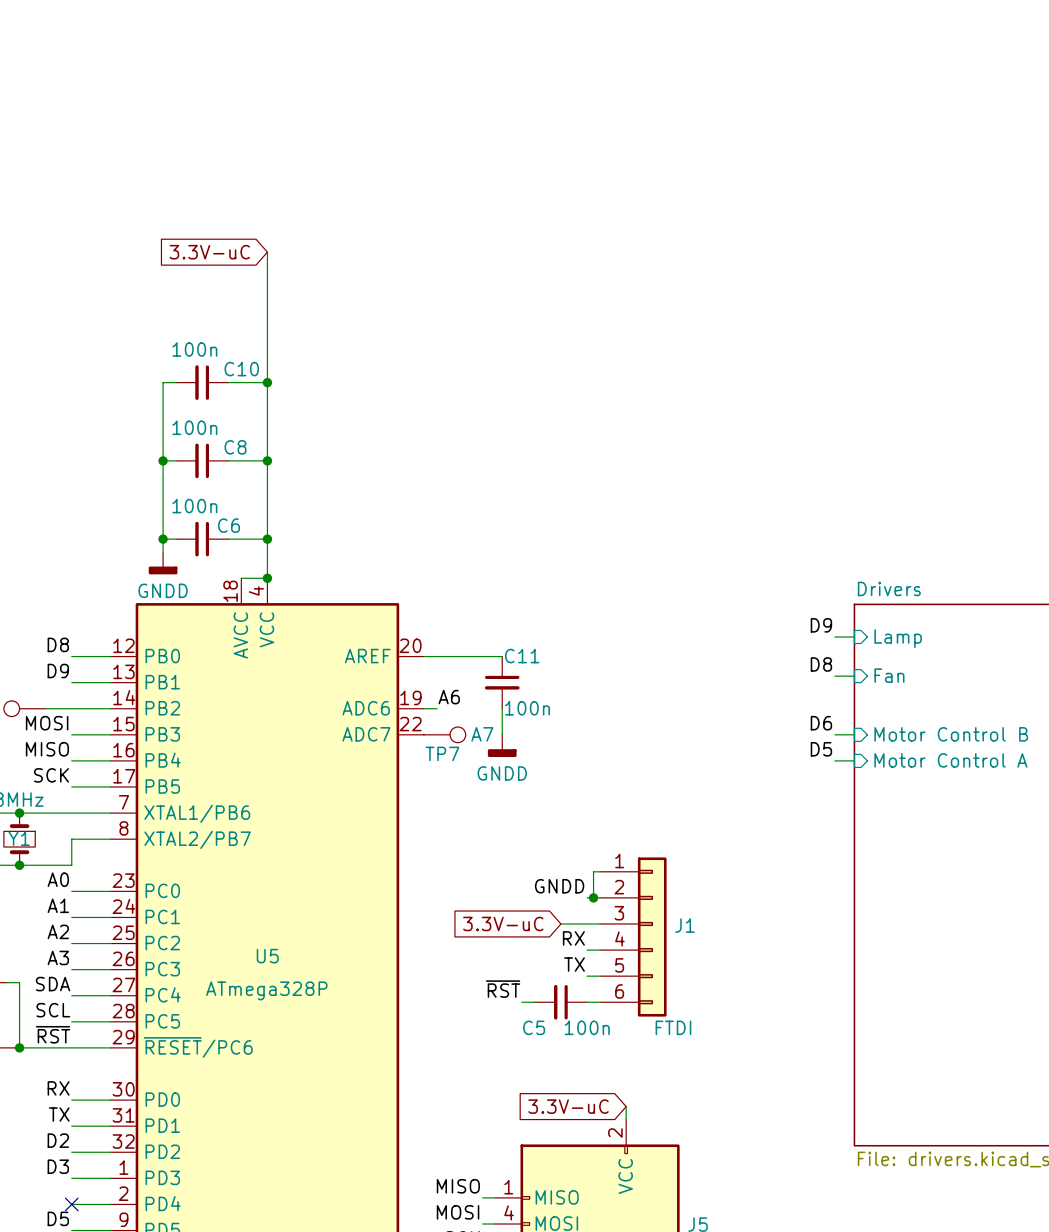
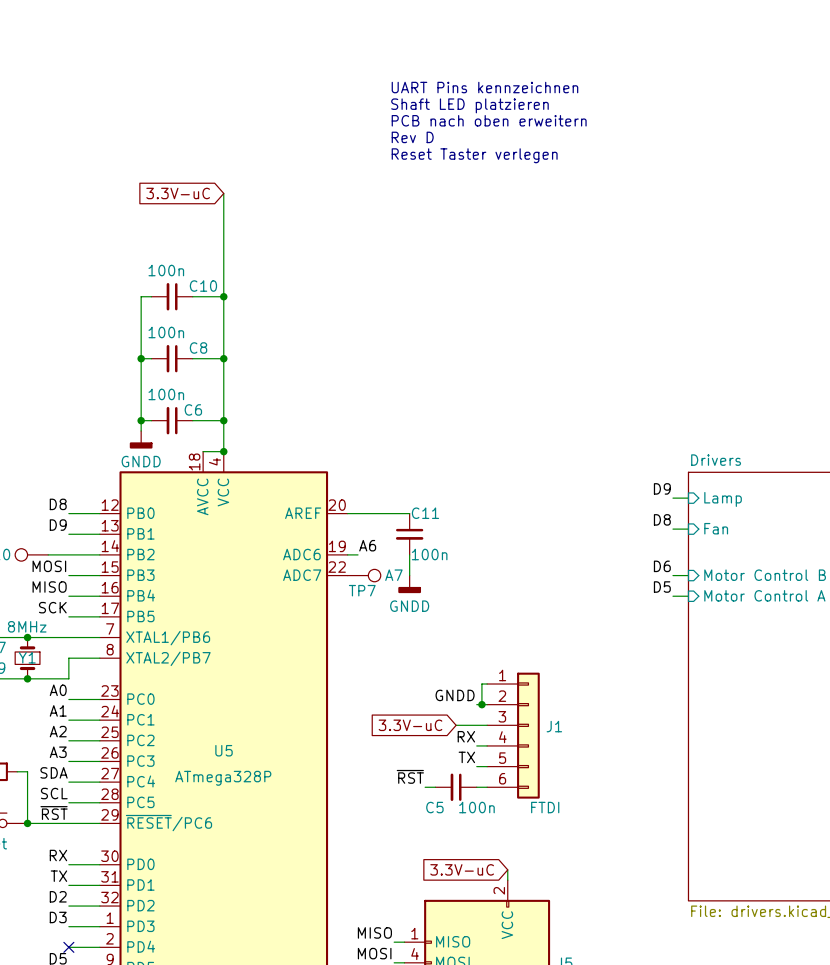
text: none -> UART Pins kennzeichnen (484, 87)
text: none -> Shaft LED platzieren (469, 105)
text: none -> PCB nach oben erweitern (489, 120)
text: none -> Rev D (412, 137)
text: none -> Reset Taster verlegen (474, 155)

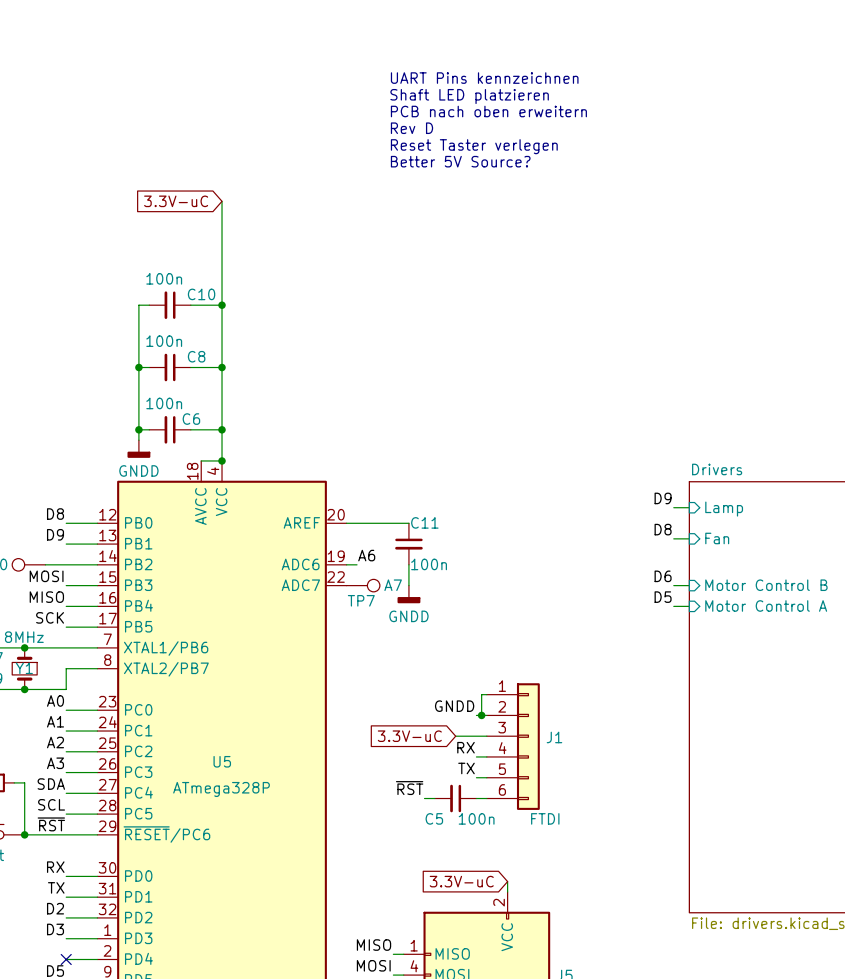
text: none -> UART Pins kennzeichnen (484, 78)
text: UART Pins kennzeichnen (484, 87) -> Shaft LED platzieren (469, 96)
text: Shaft LED platzieren (469, 105) -> PCB nach oben erweitern (488, 111)
text: PCB nach oben erweitern (489, 120) -> Rev D (411, 128)
text: Rev D (412, 137) -> Reset Taster verlegen (474, 146)
text: Reset Taster verlegen (474, 155) -> Better 5V Source? (460, 161)

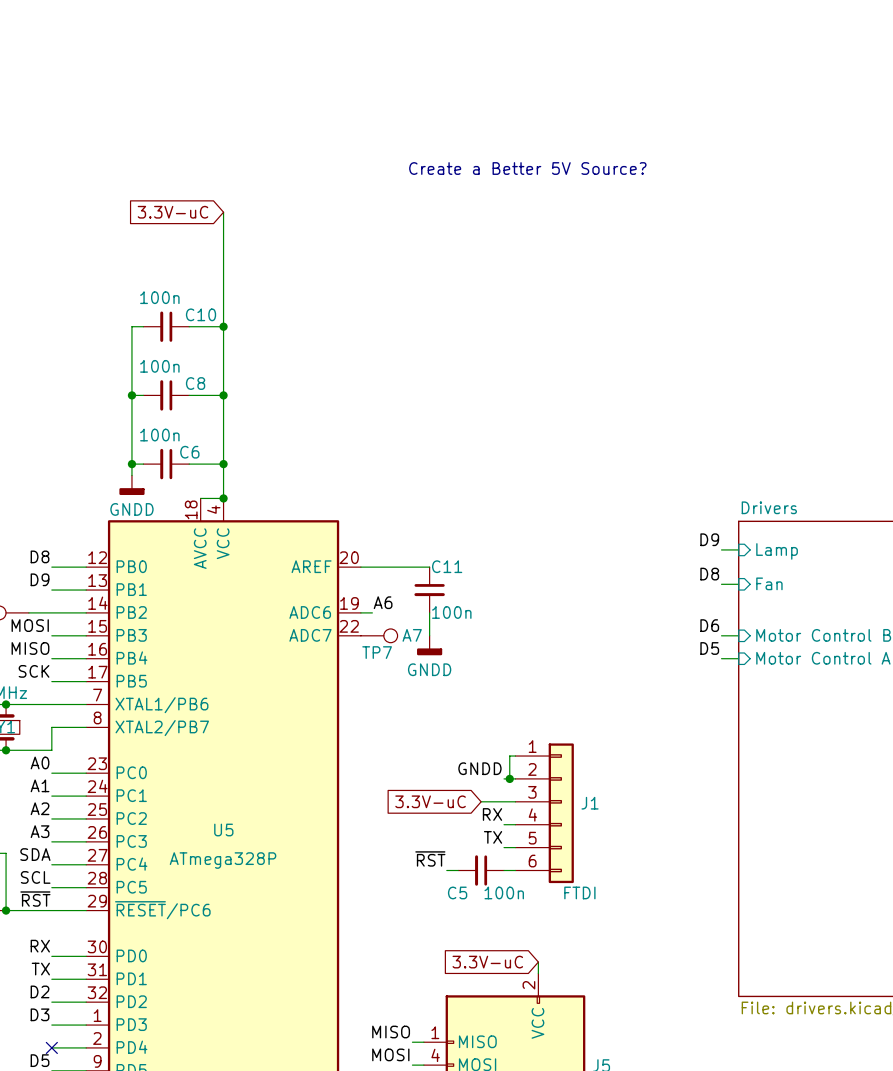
text: UART Pins kennzeichnen (484, 78) -> none
text: Shaft LED platzieren (469, 96) -> none
text: PCB nach oben erweitern (488, 111) -> none
text: Rev D (411, 128) -> none
text: Reset Taster verlegen (474, 146) -> none
text: Better 5V Source? (460, 161) -> Create a Better 5V Source? (527, 168)

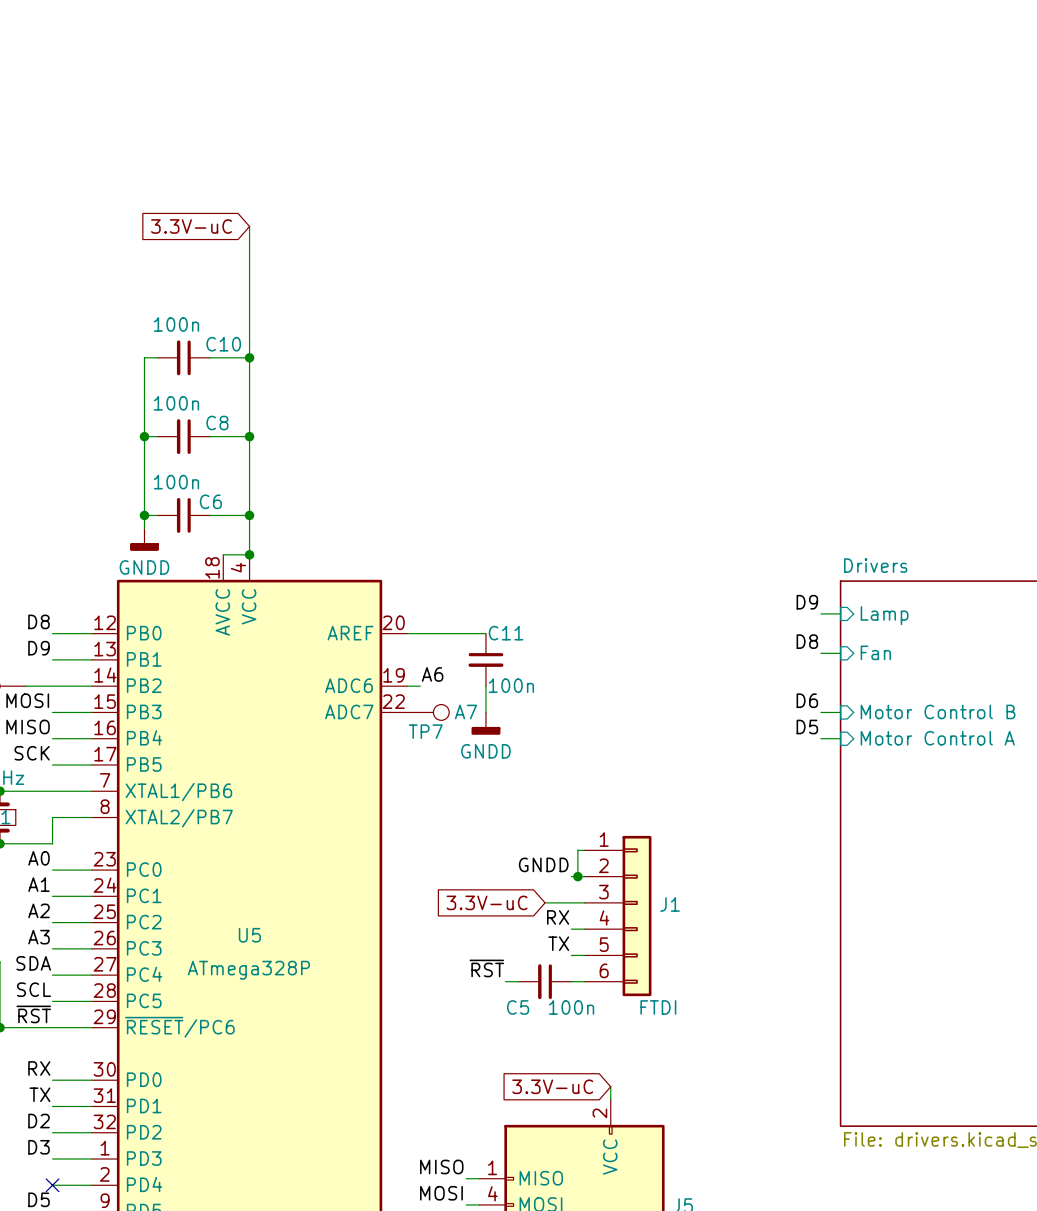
text: Create a Better 5V Source? (527, 168) -> none

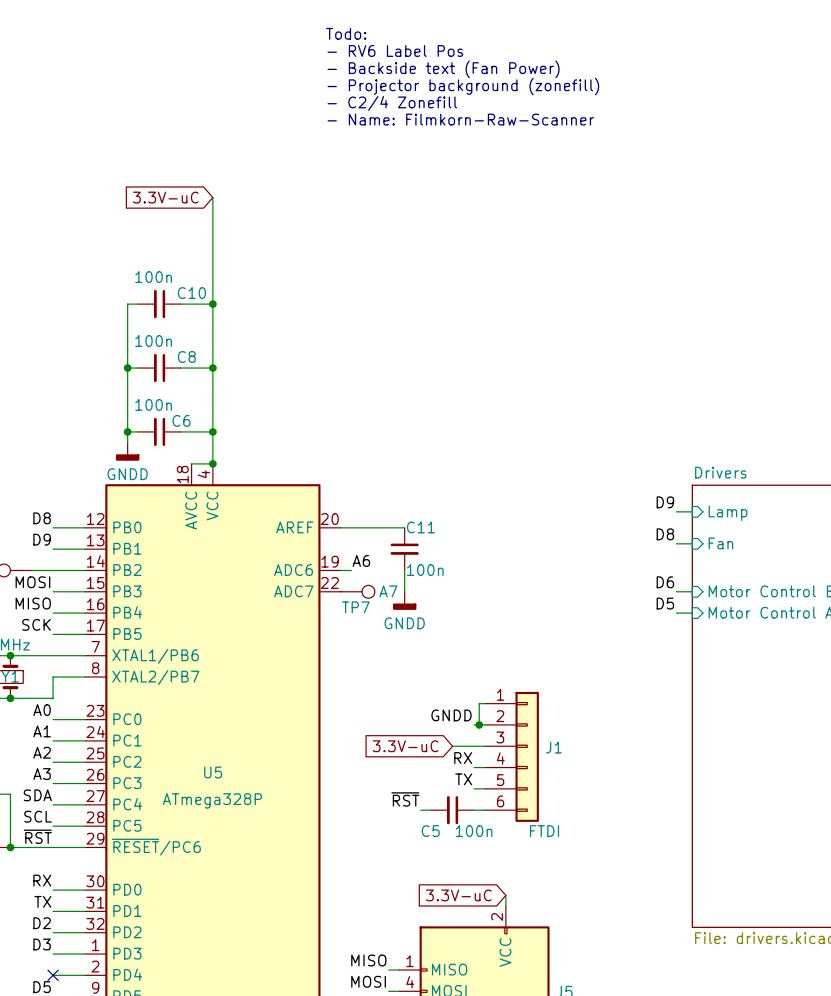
text: none -> Todo: (346, 33)
text: none -> - RV6 Label Pos (395, 50)
text: none -> - Backside text (Fan Power) (443, 69)
text: none -> - Projector background (zonefill) (463, 86)
text: none -> - C2/4 Zonefill (392, 103)
text: none -> - Name: Filmkorn-Raw-Scanner (460, 119)

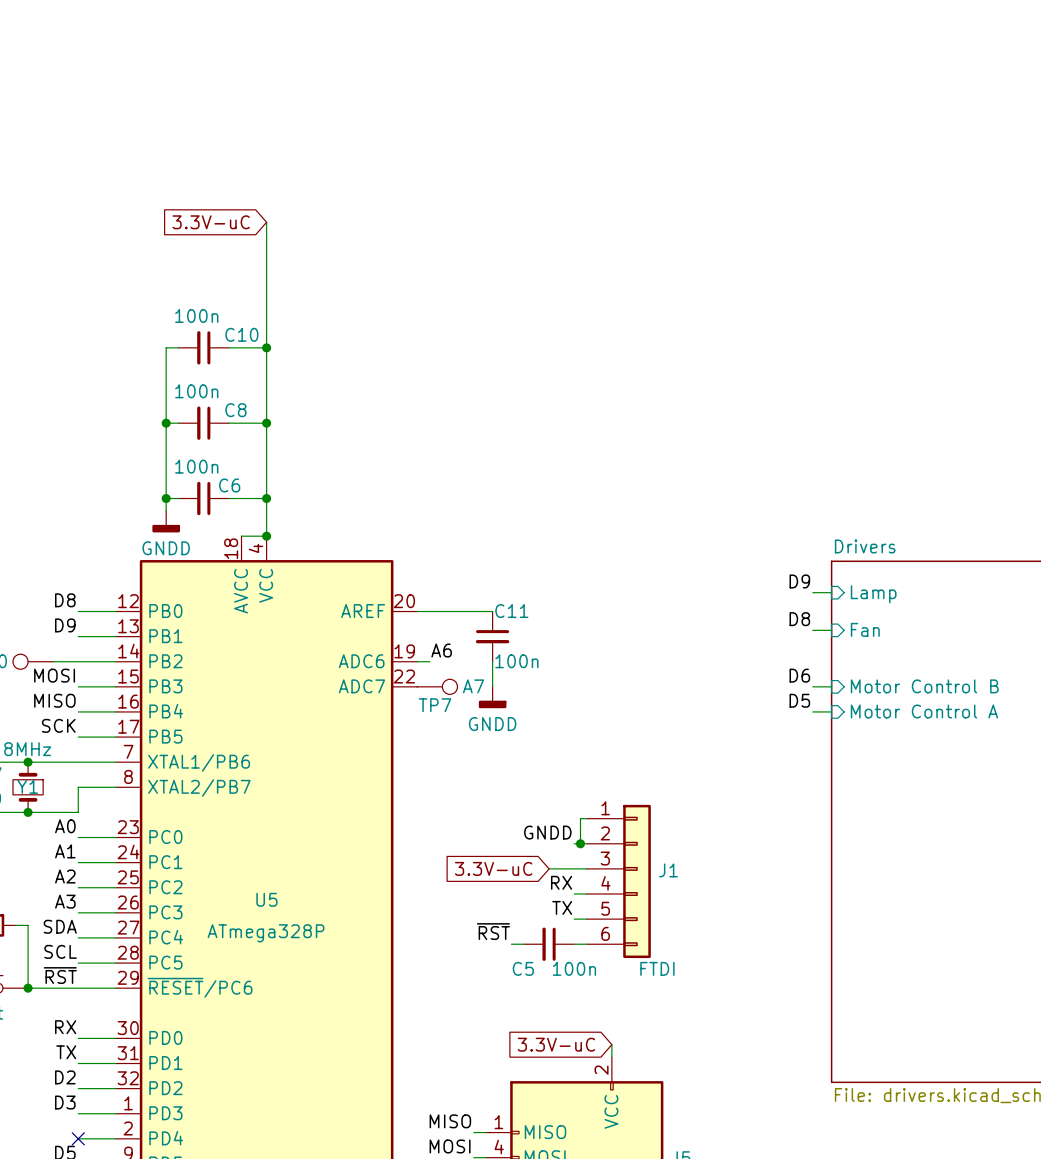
text: Todo: (346, 33) -> none
text: - RV6 Label Pos (395, 50) -> none
text: - Backside text (Fan Power) (443, 69) -> none
text: - Projector background (zonefill) (463, 86) -> none
text: - C2/4 Zonefill (392, 103) -> none
text: - Name: Filmkorn-Raw-Scanner (460, 119) -> none

